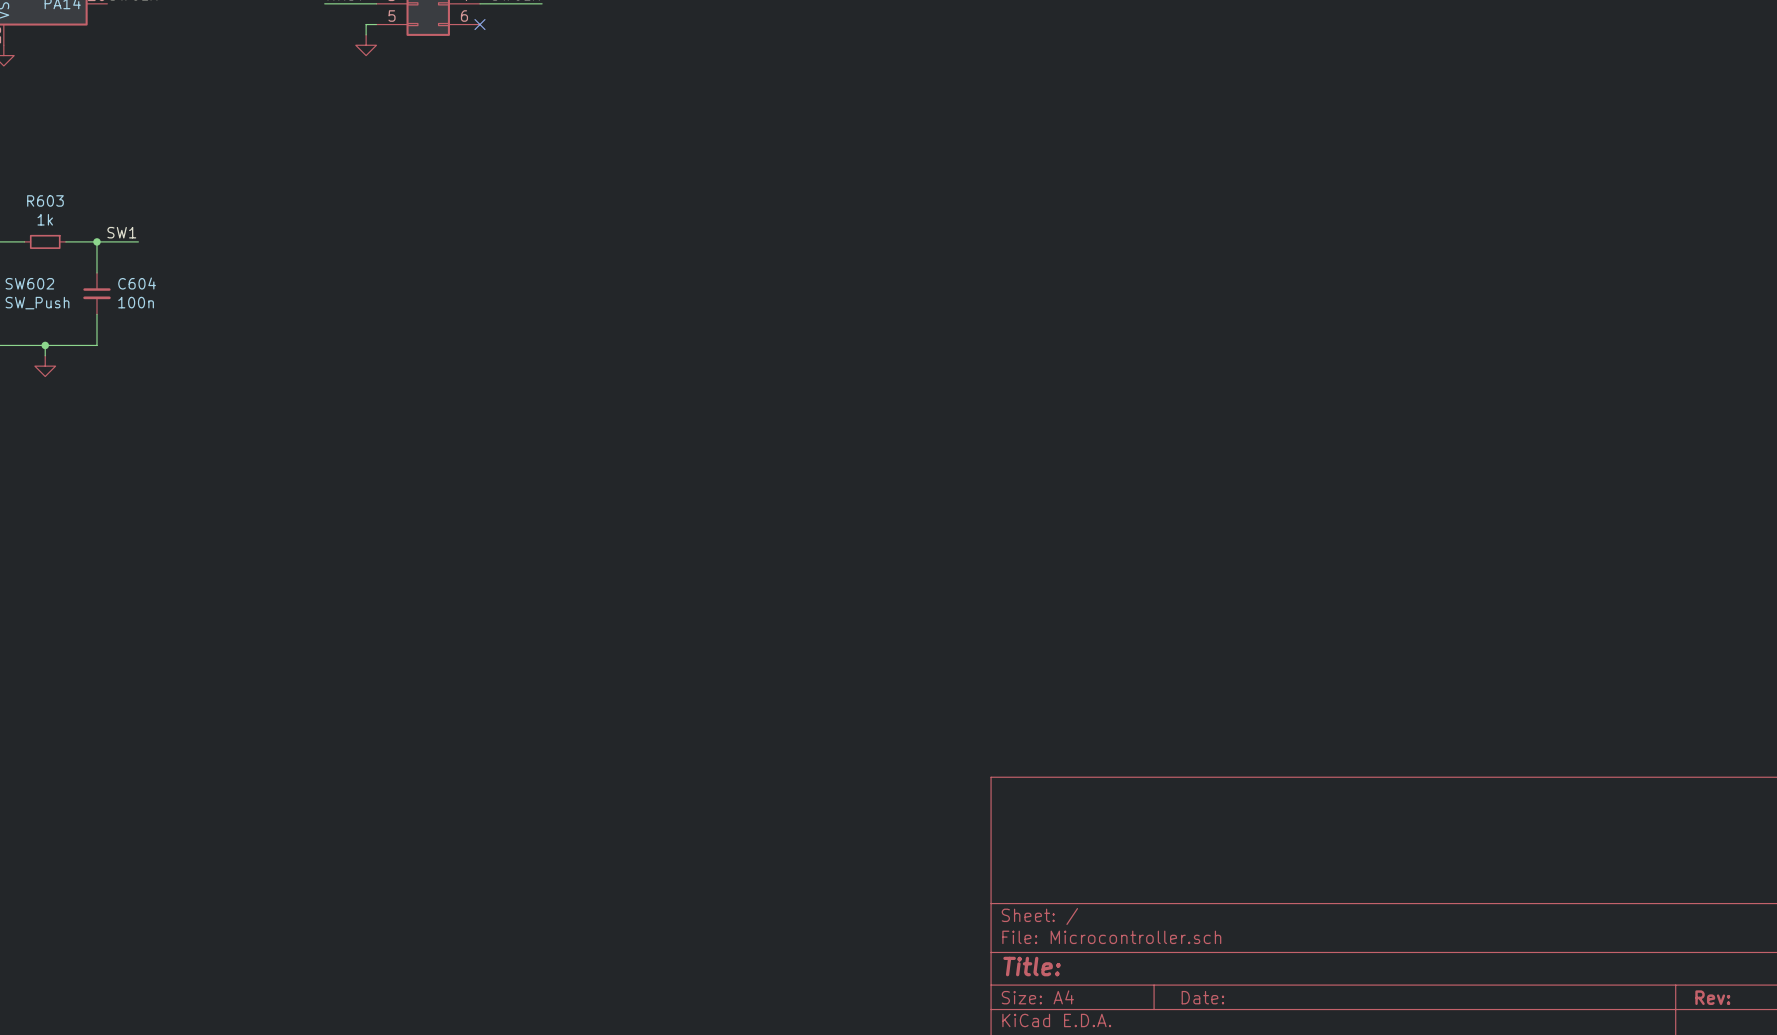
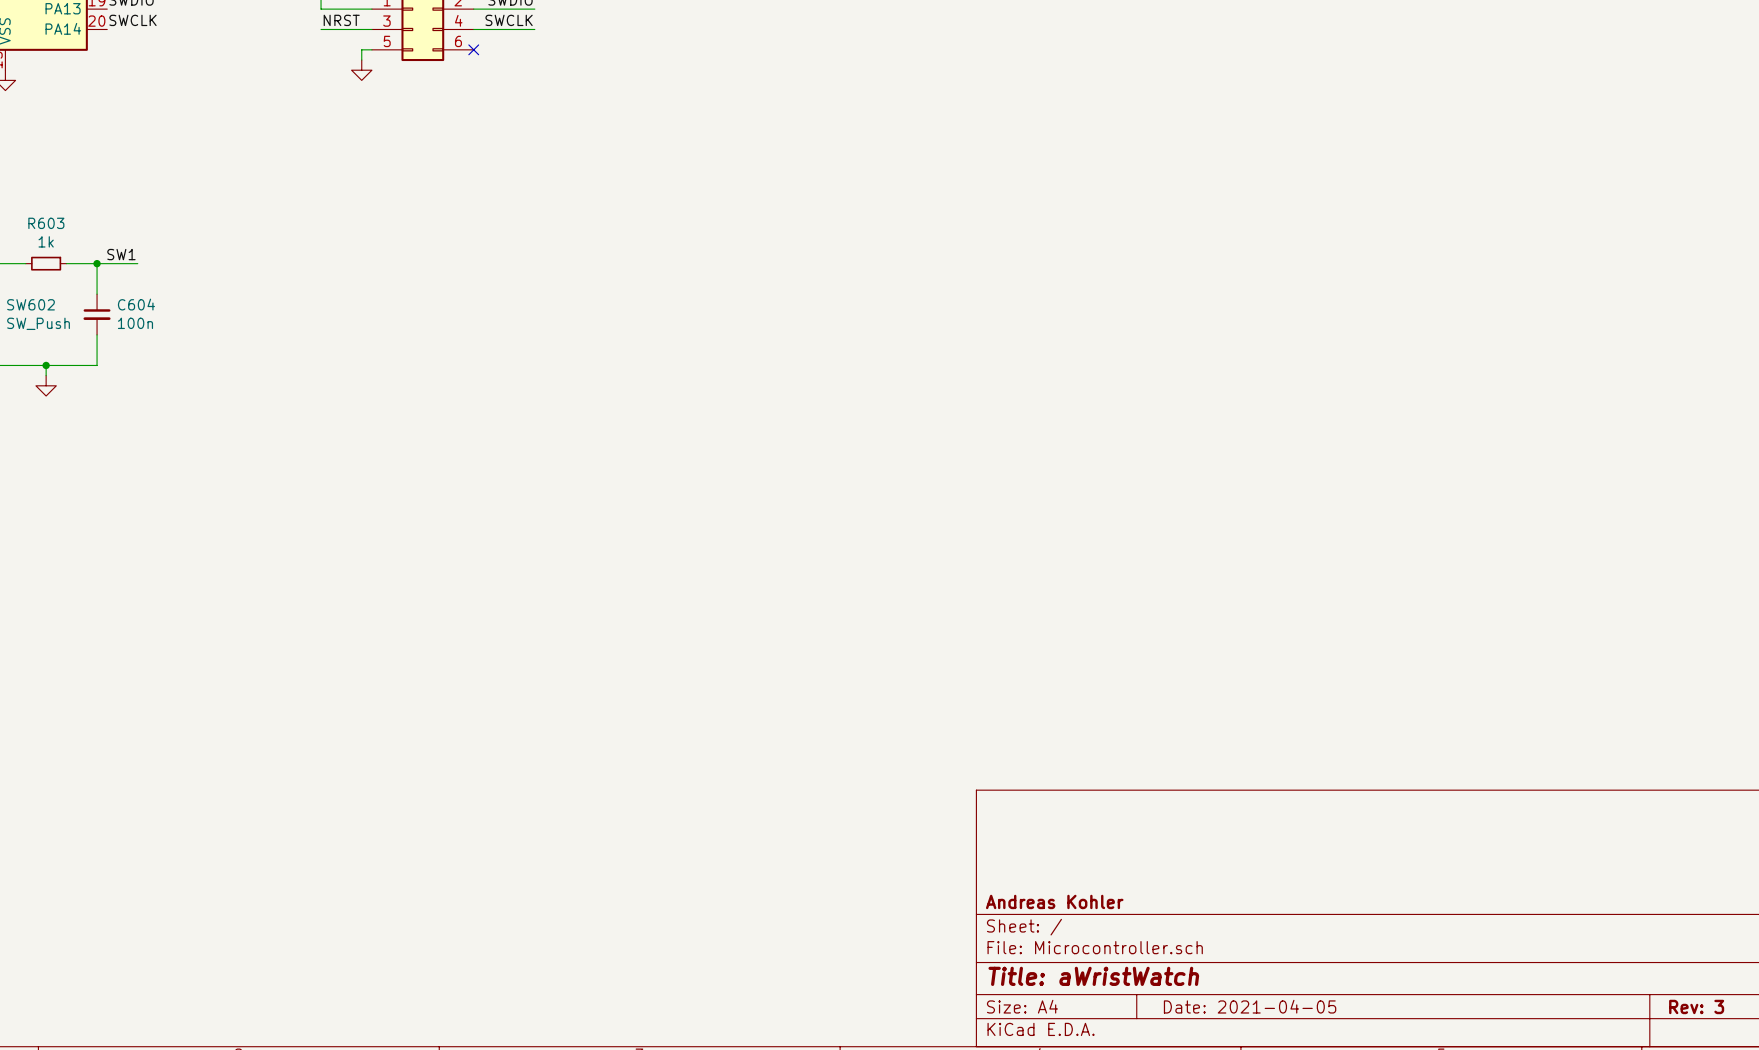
title block: none -> Andreas Kohler (1054, 901)
title block: Title: (1032, 966) -> Title: aWristWatch (1093, 976)
title block: Date: (1202, 997) -> Date: 2021-04-05 (1250, 1006)
title block: Rev: (1712, 997) -> Rev: 3 (1696, 1006)

